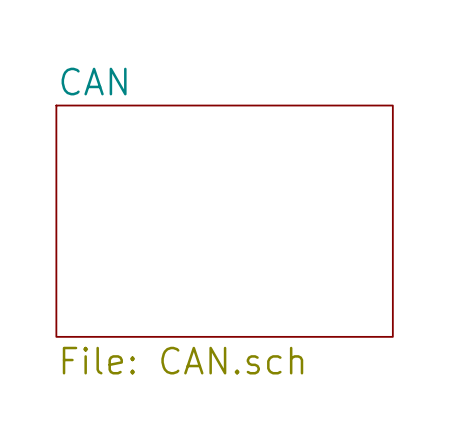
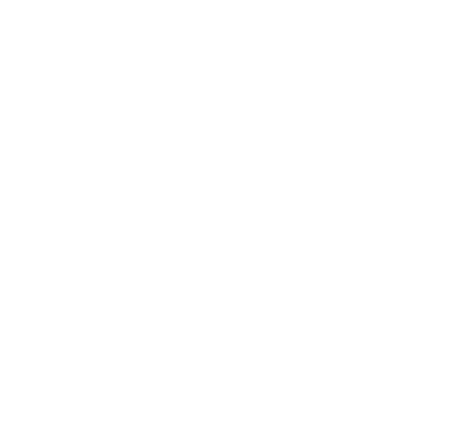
sheet CAN: File: CAN.sch (224, 221) -> none

